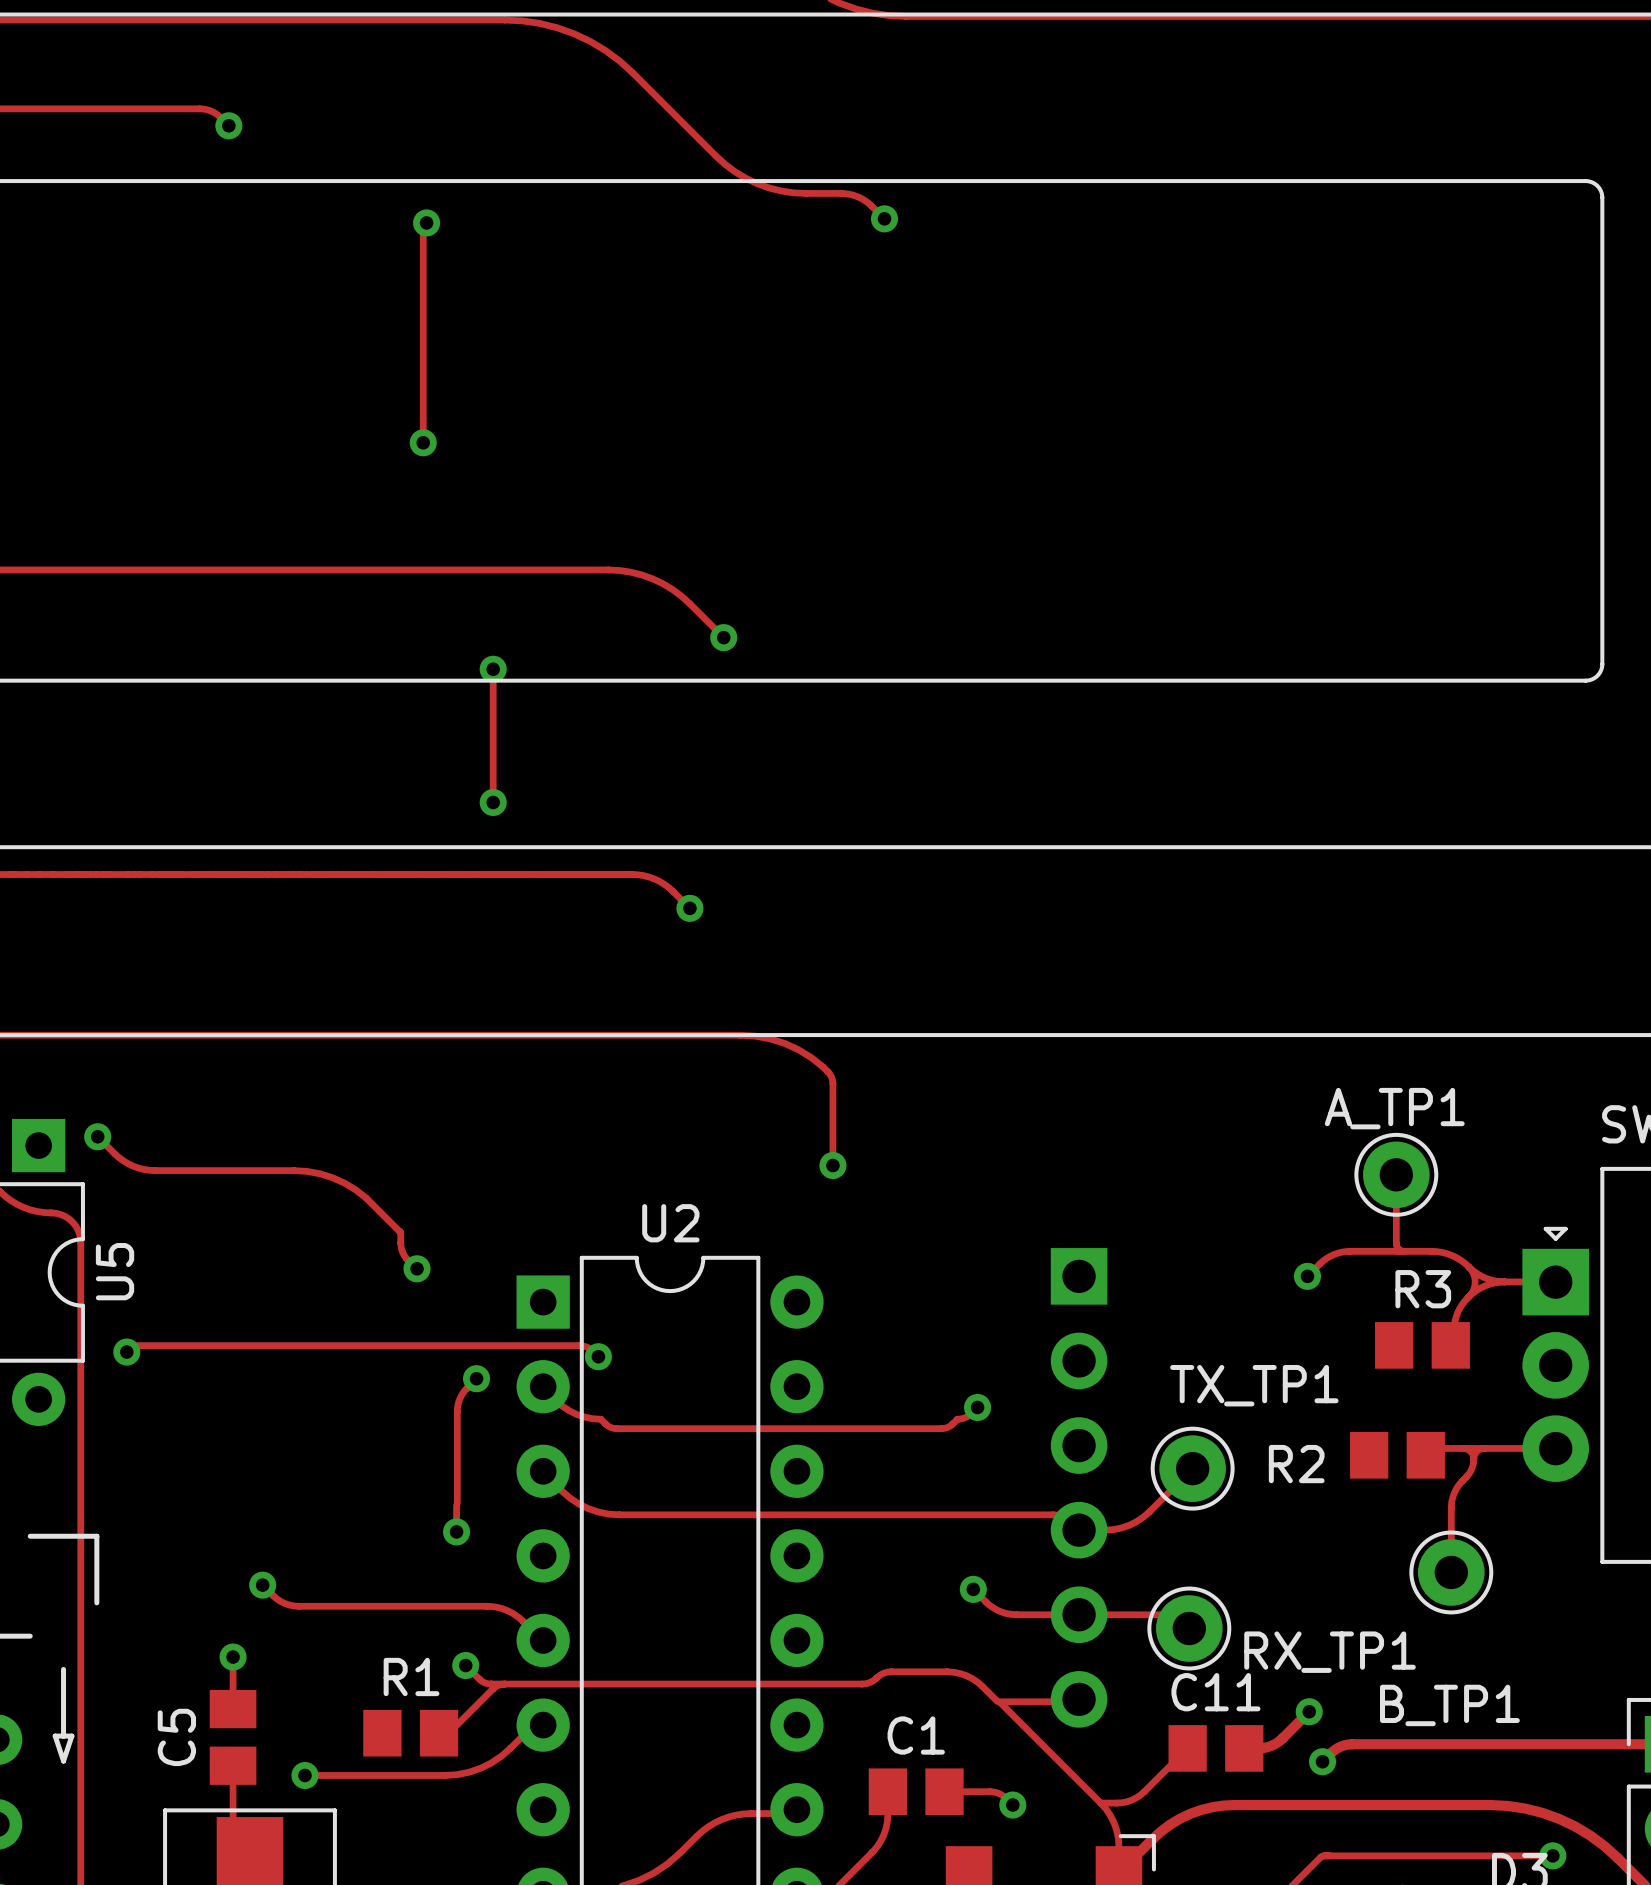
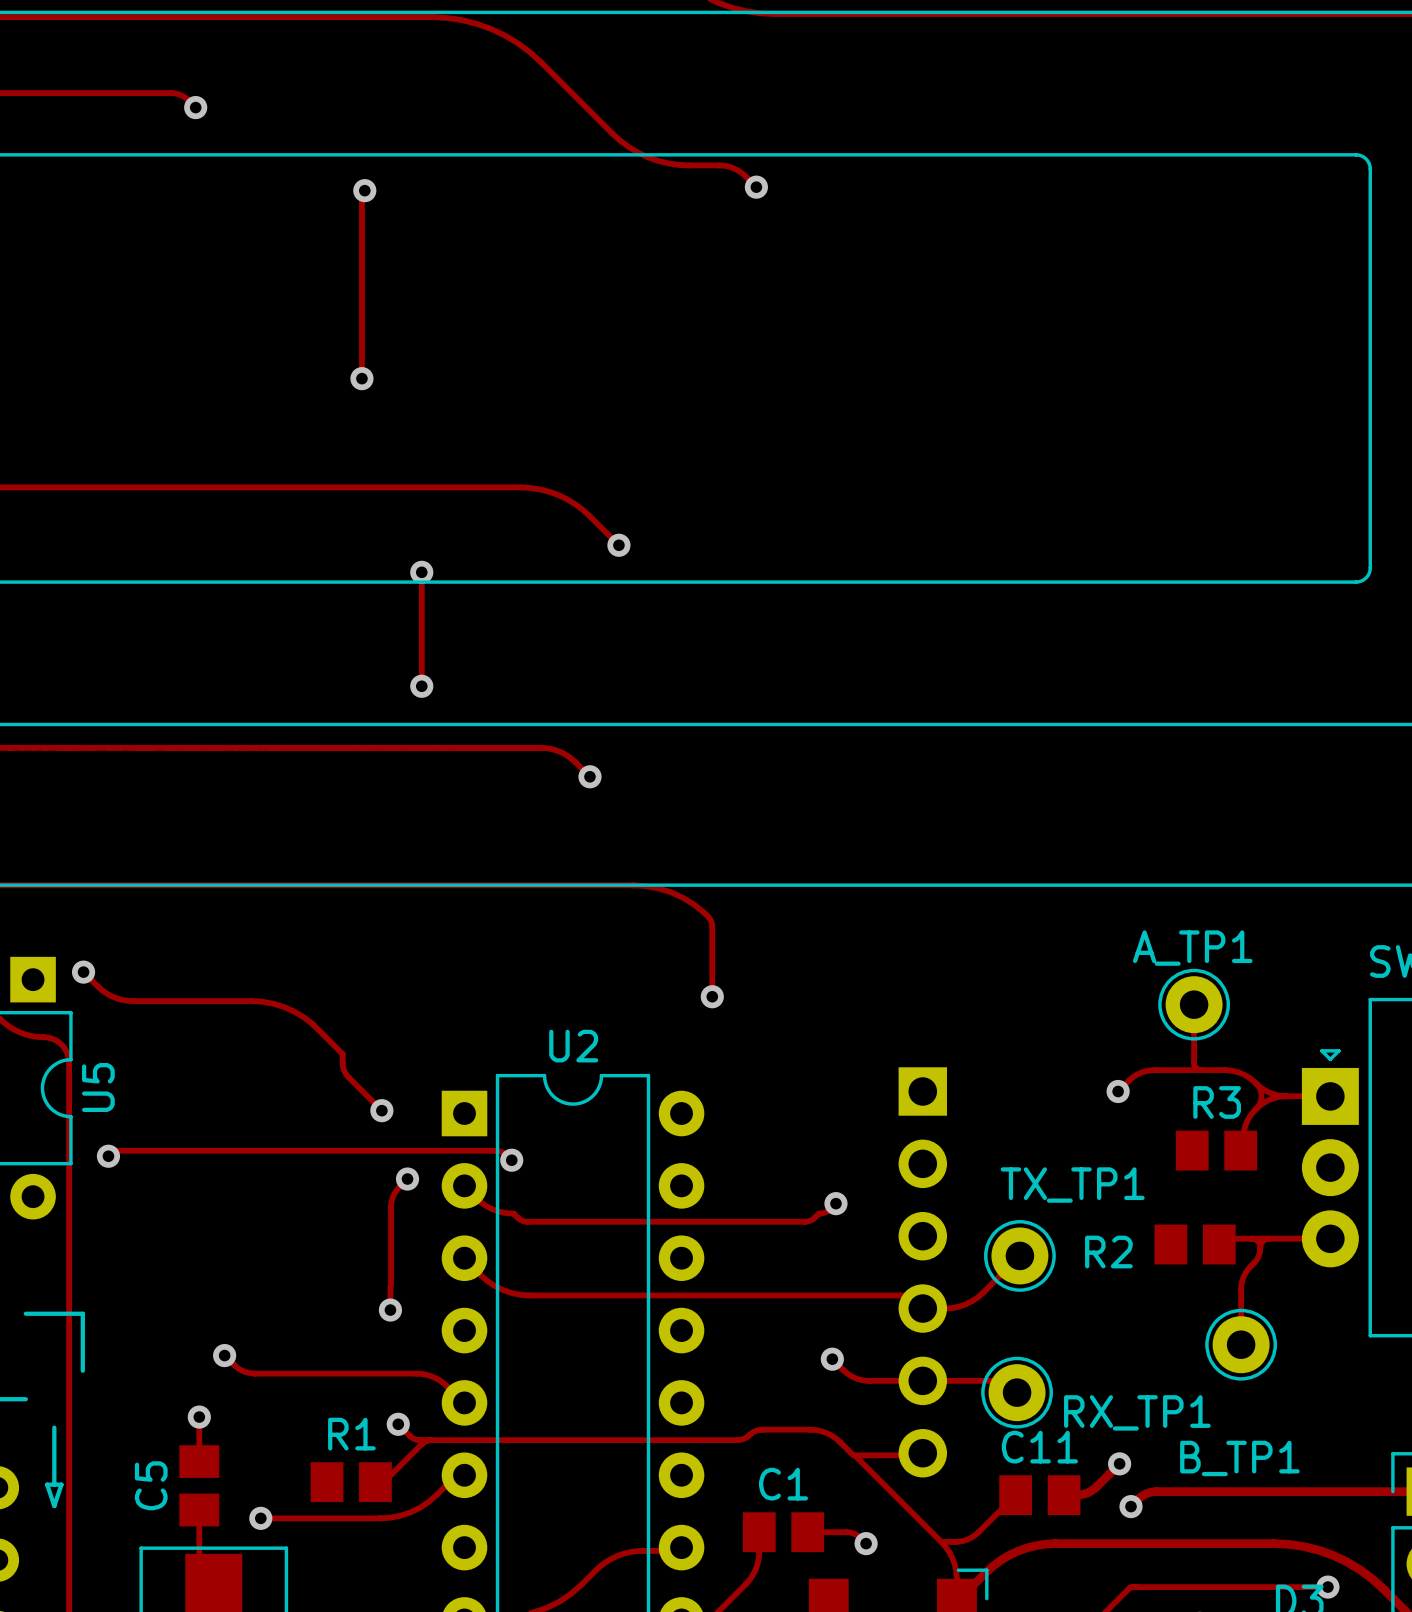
track: (400, 1242) (404, 1256) (416, 1268) -> (342, 1062) (347, 1076) (381, 1110)
via position: (417, 1268) -> (381, 1110)

